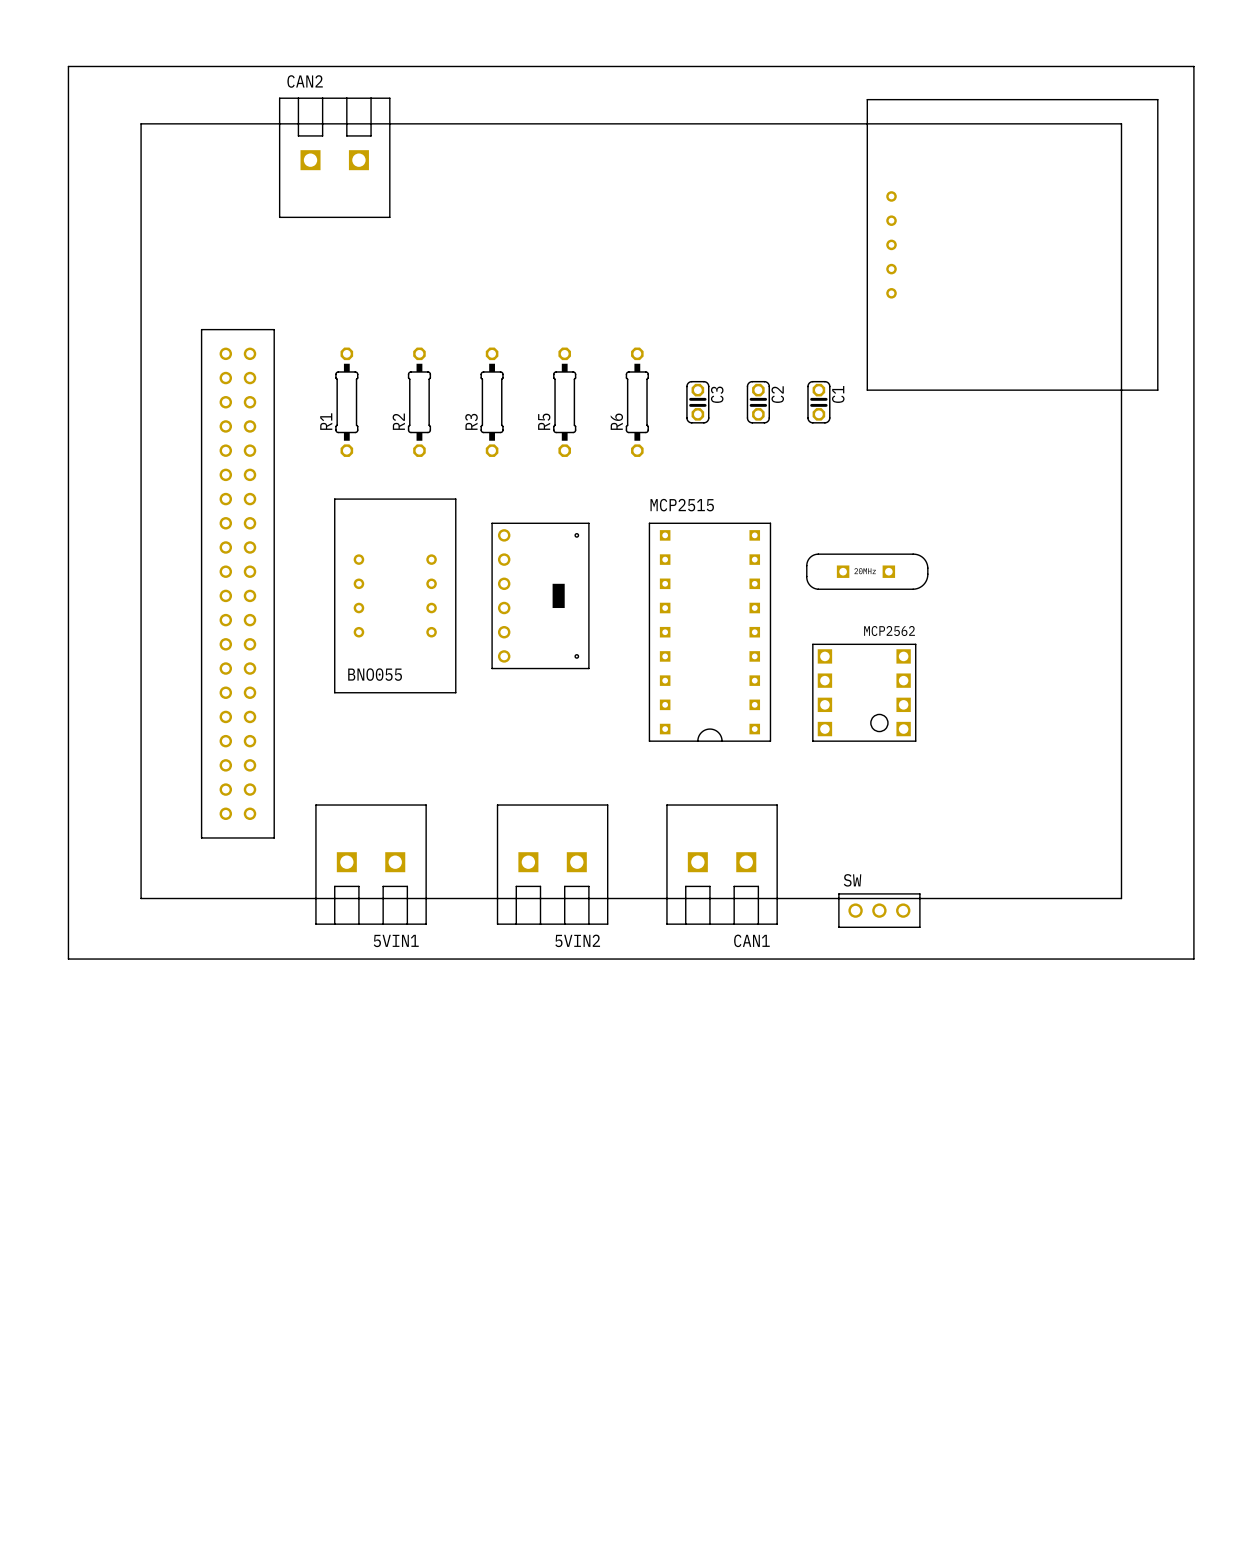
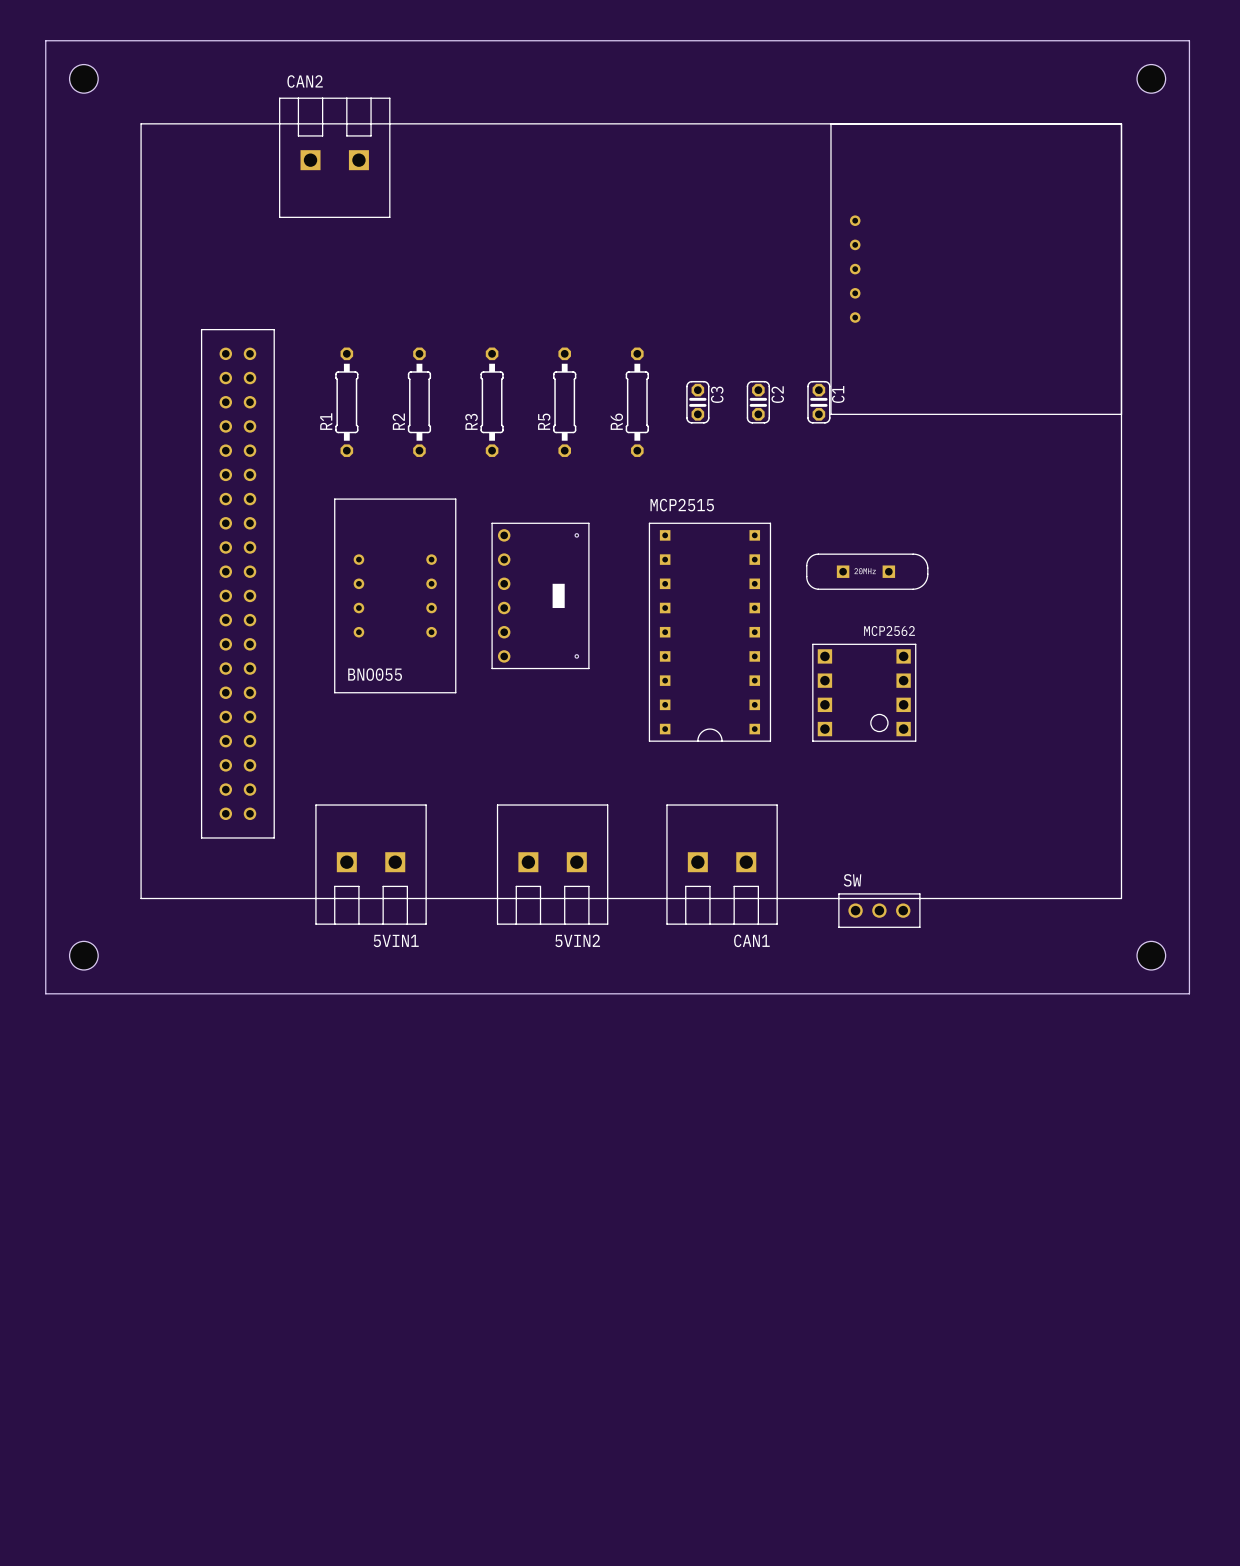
board edge: (68, 66) (1193, 66) (1193, 959) (68, 959) (68, 66) -> (45, 40) (45, 993) (1189, 993) (1189, 40) (45, 40)
hole: none -> (83, 78)
hole: none -> (1151, 78)
part position: (1012, 244) -> (976, 269)
hole: none -> (83, 955)
hole: none -> (1151, 955)

